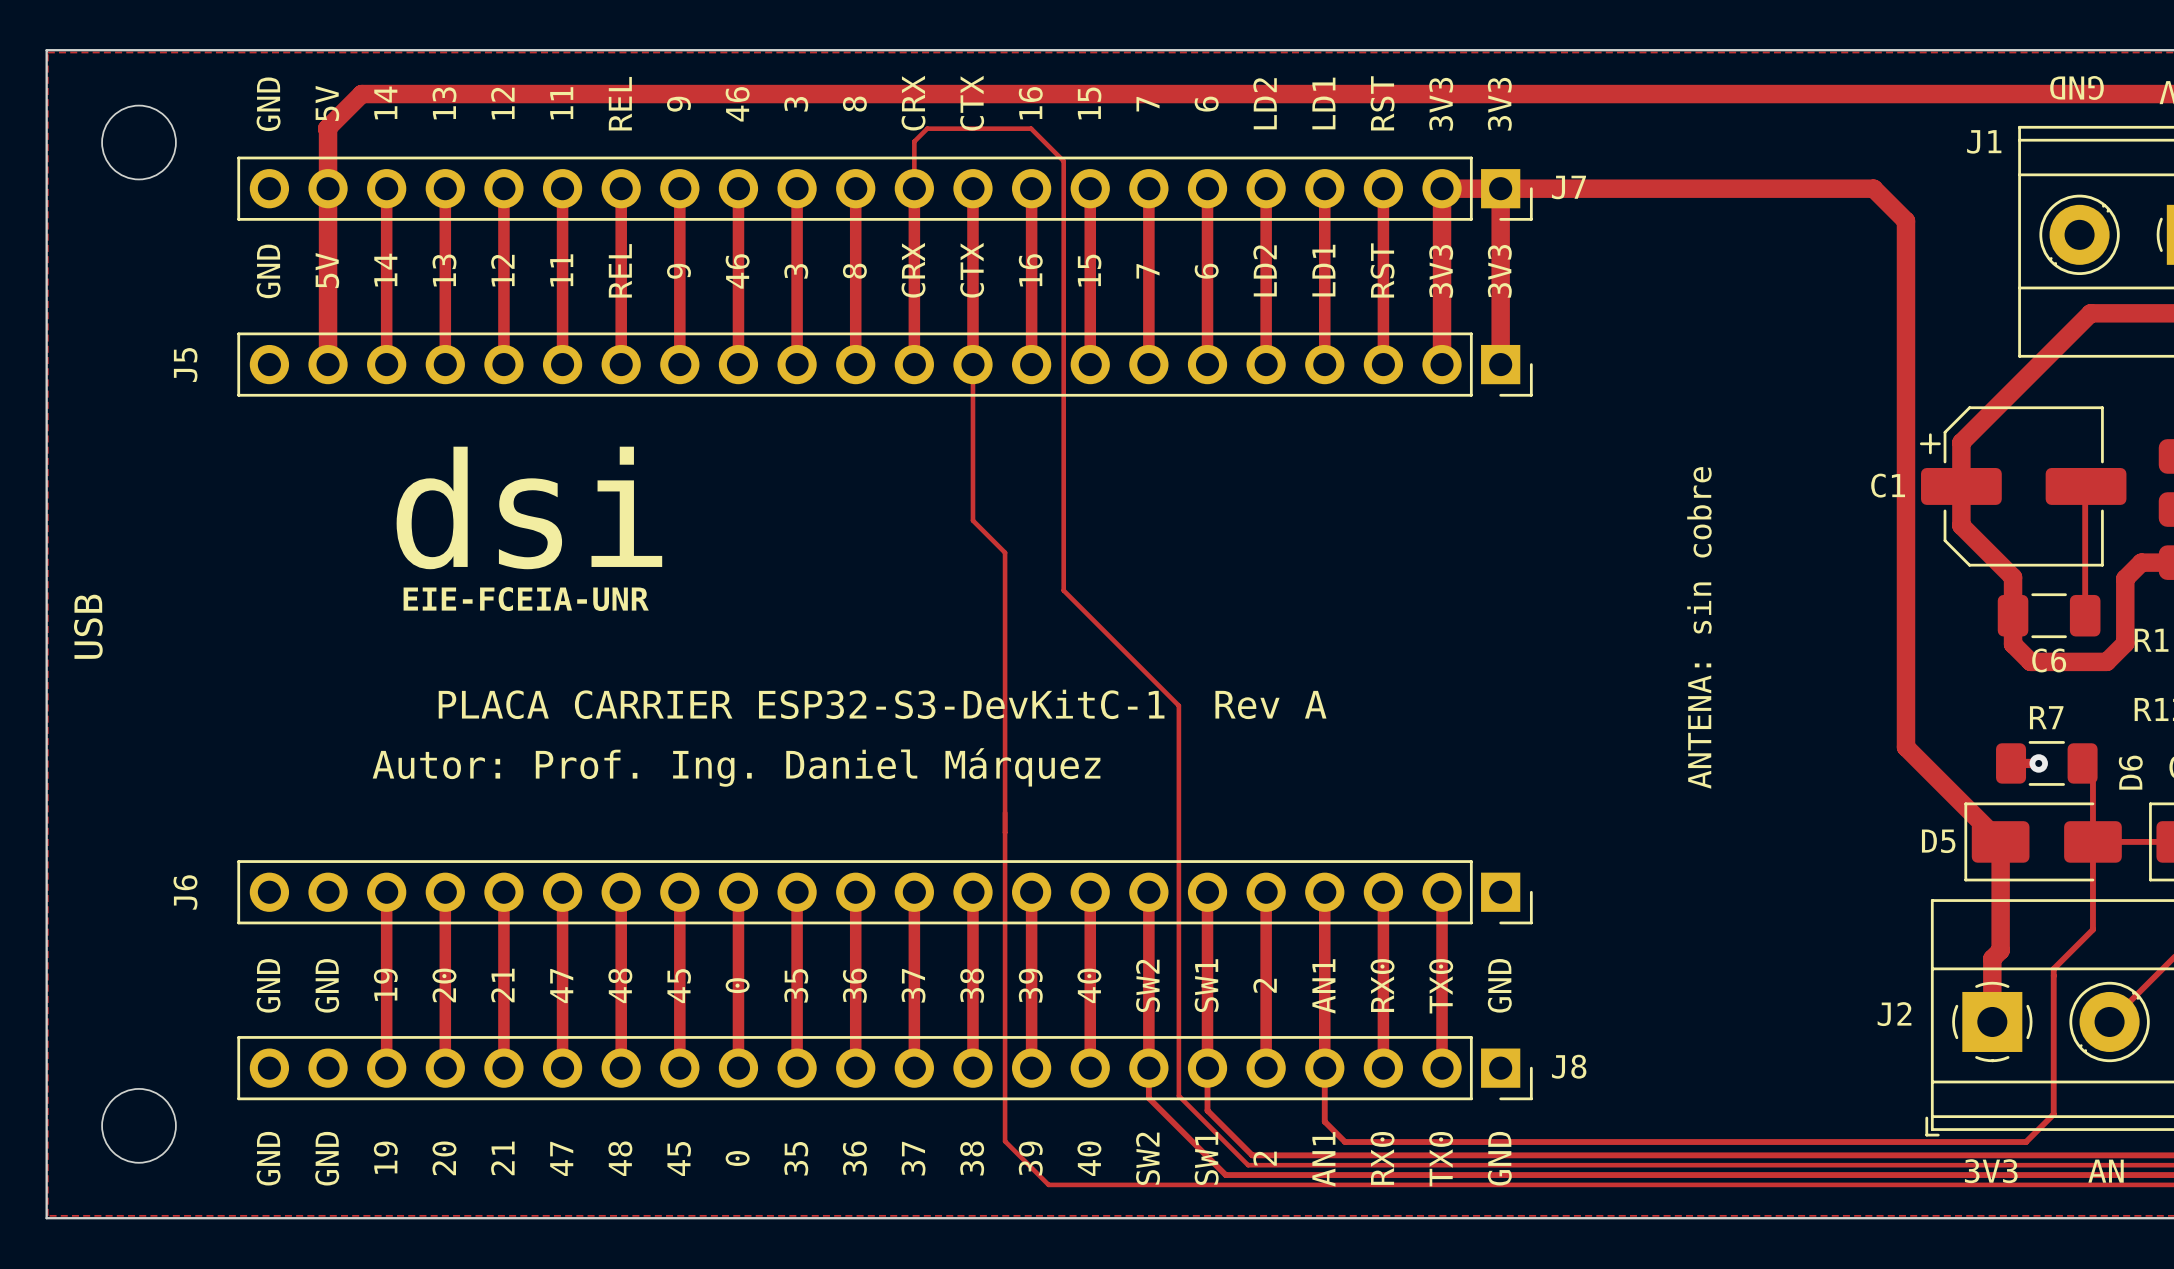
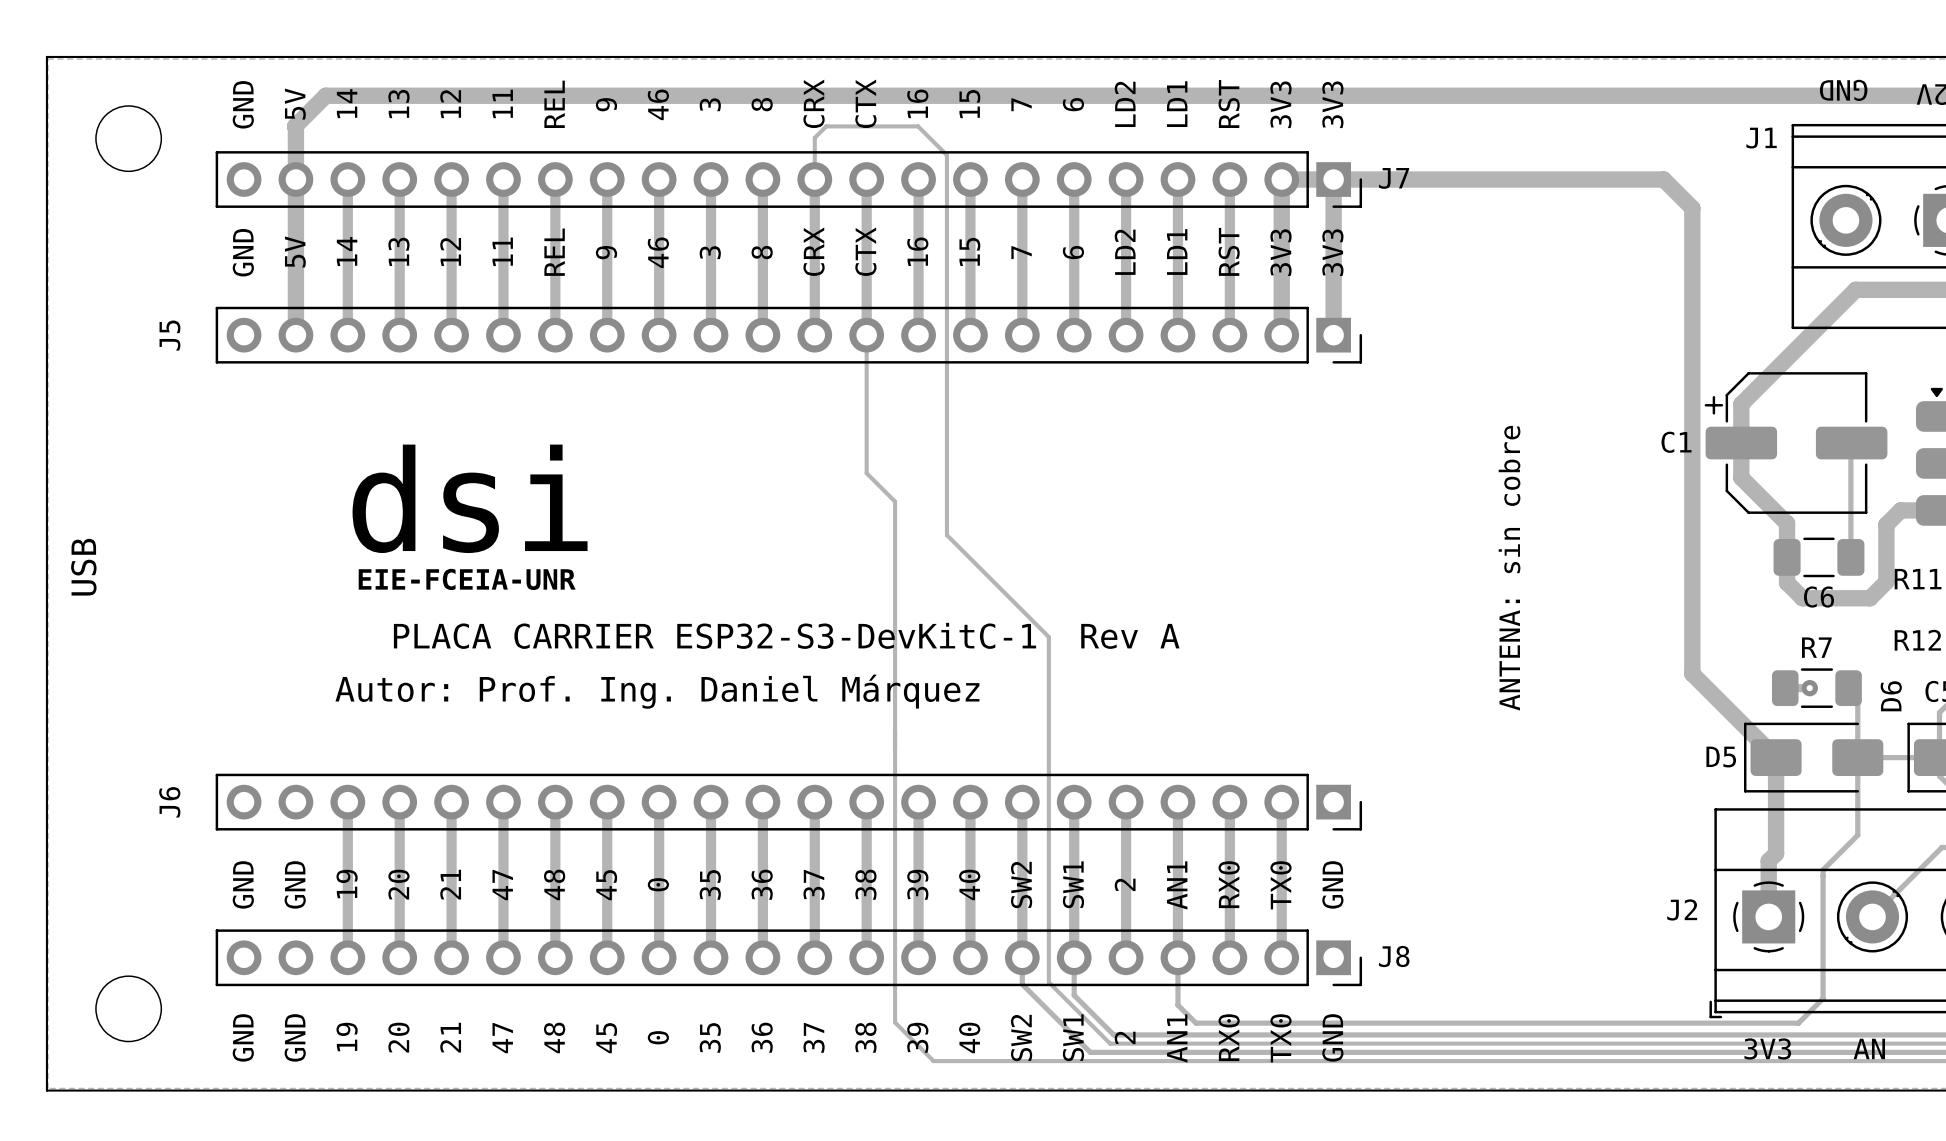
text position: dsi (529, 507) -> dsi (470, 498)
text position: EIE-FCEIA-UNR (526, 599) -> EIE-FCEIA-UNR (467, 579)

